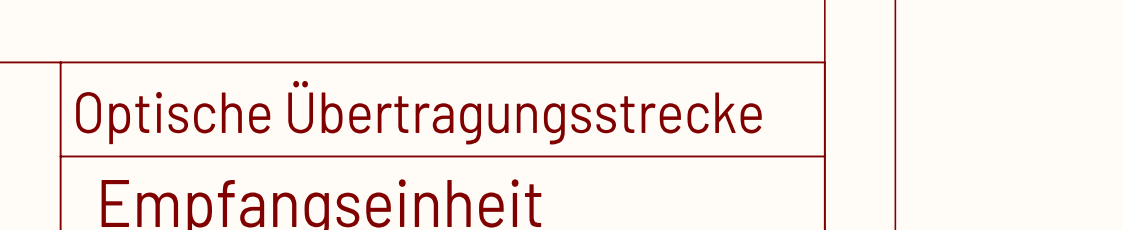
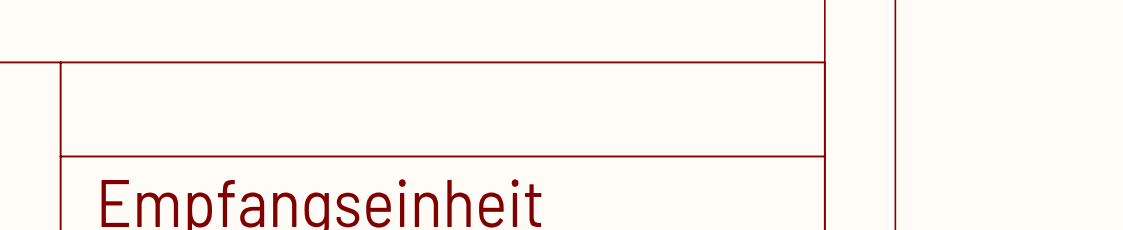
text: Optische Übertragungsstrecke (418, 112) -> none

